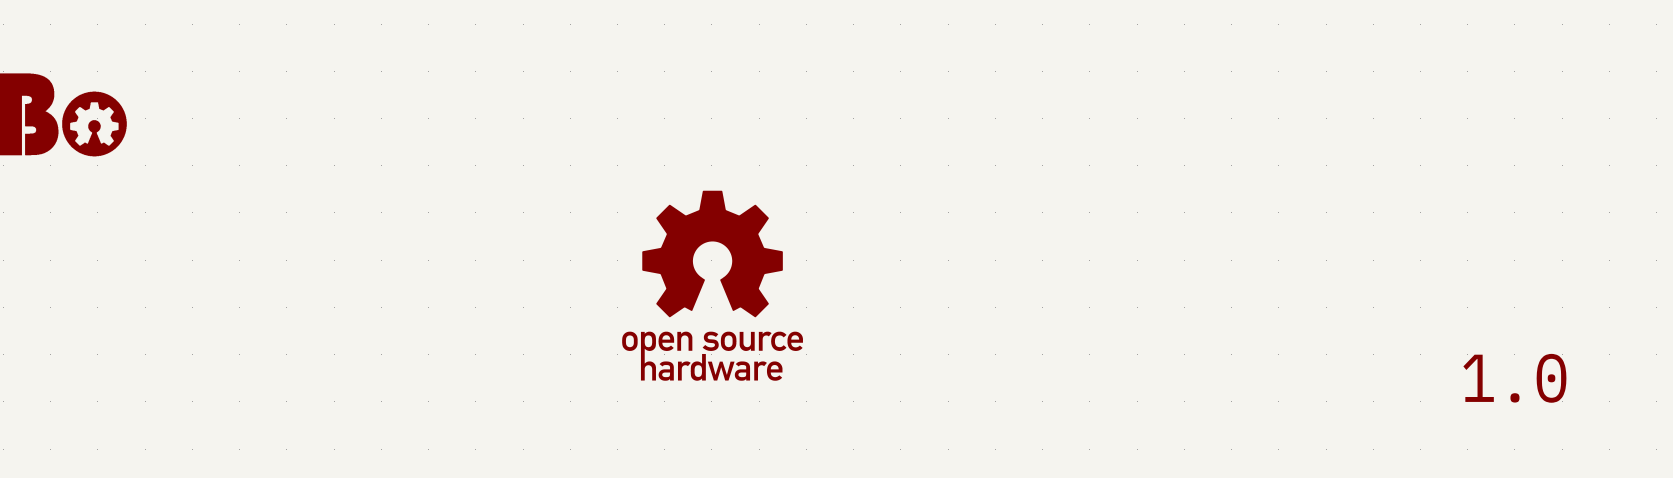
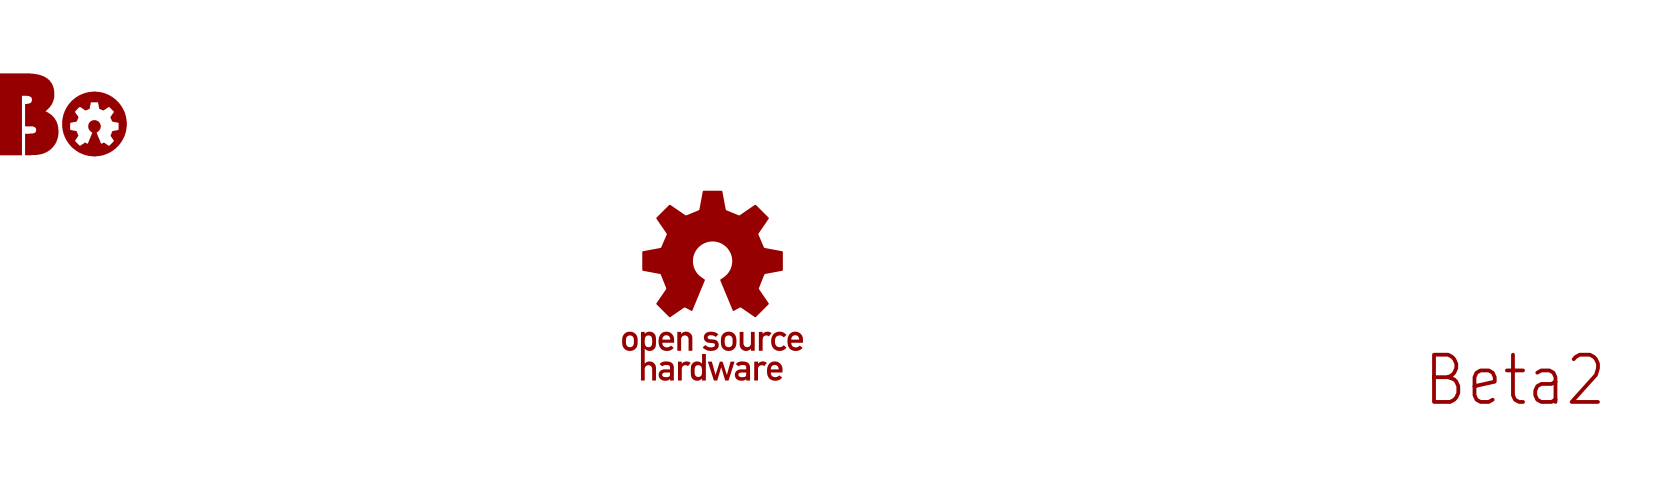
text: 1.0 (1514, 378) -> Beta2 (1515, 378)

